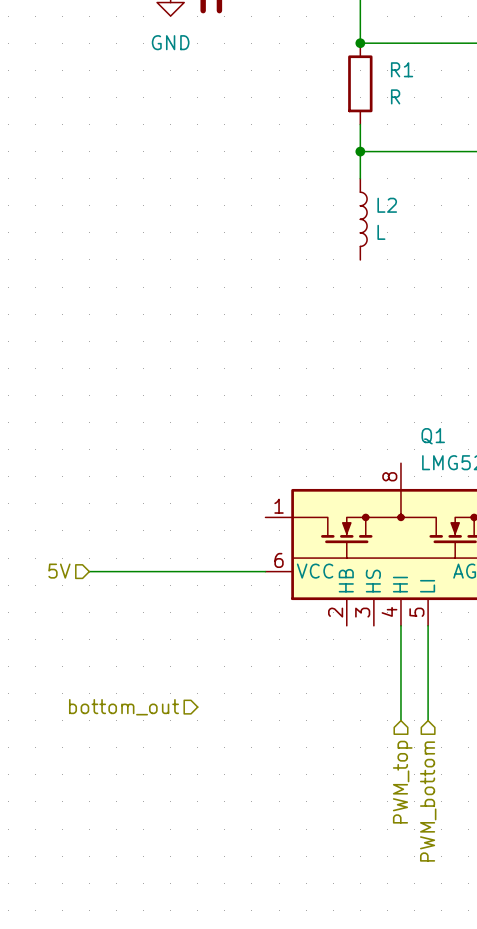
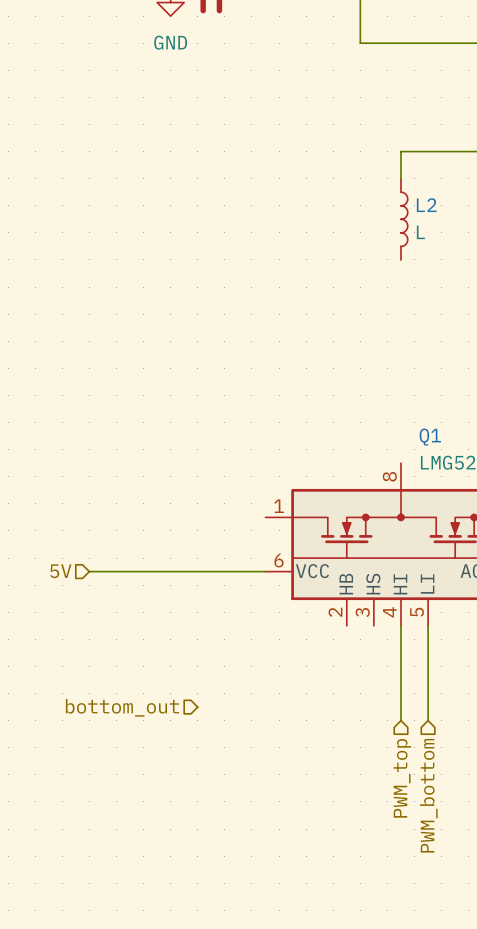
junction: (360, 43) -> none
R1: R (360, 83) -> none
wire: (360, 124) (360, 178) -> none
wire: (360, 151) (400, 151) -> (400, 178) (400, 151)
junction: (360, 151) -> none
L2 position: (363, 219) -> (404, 219)

